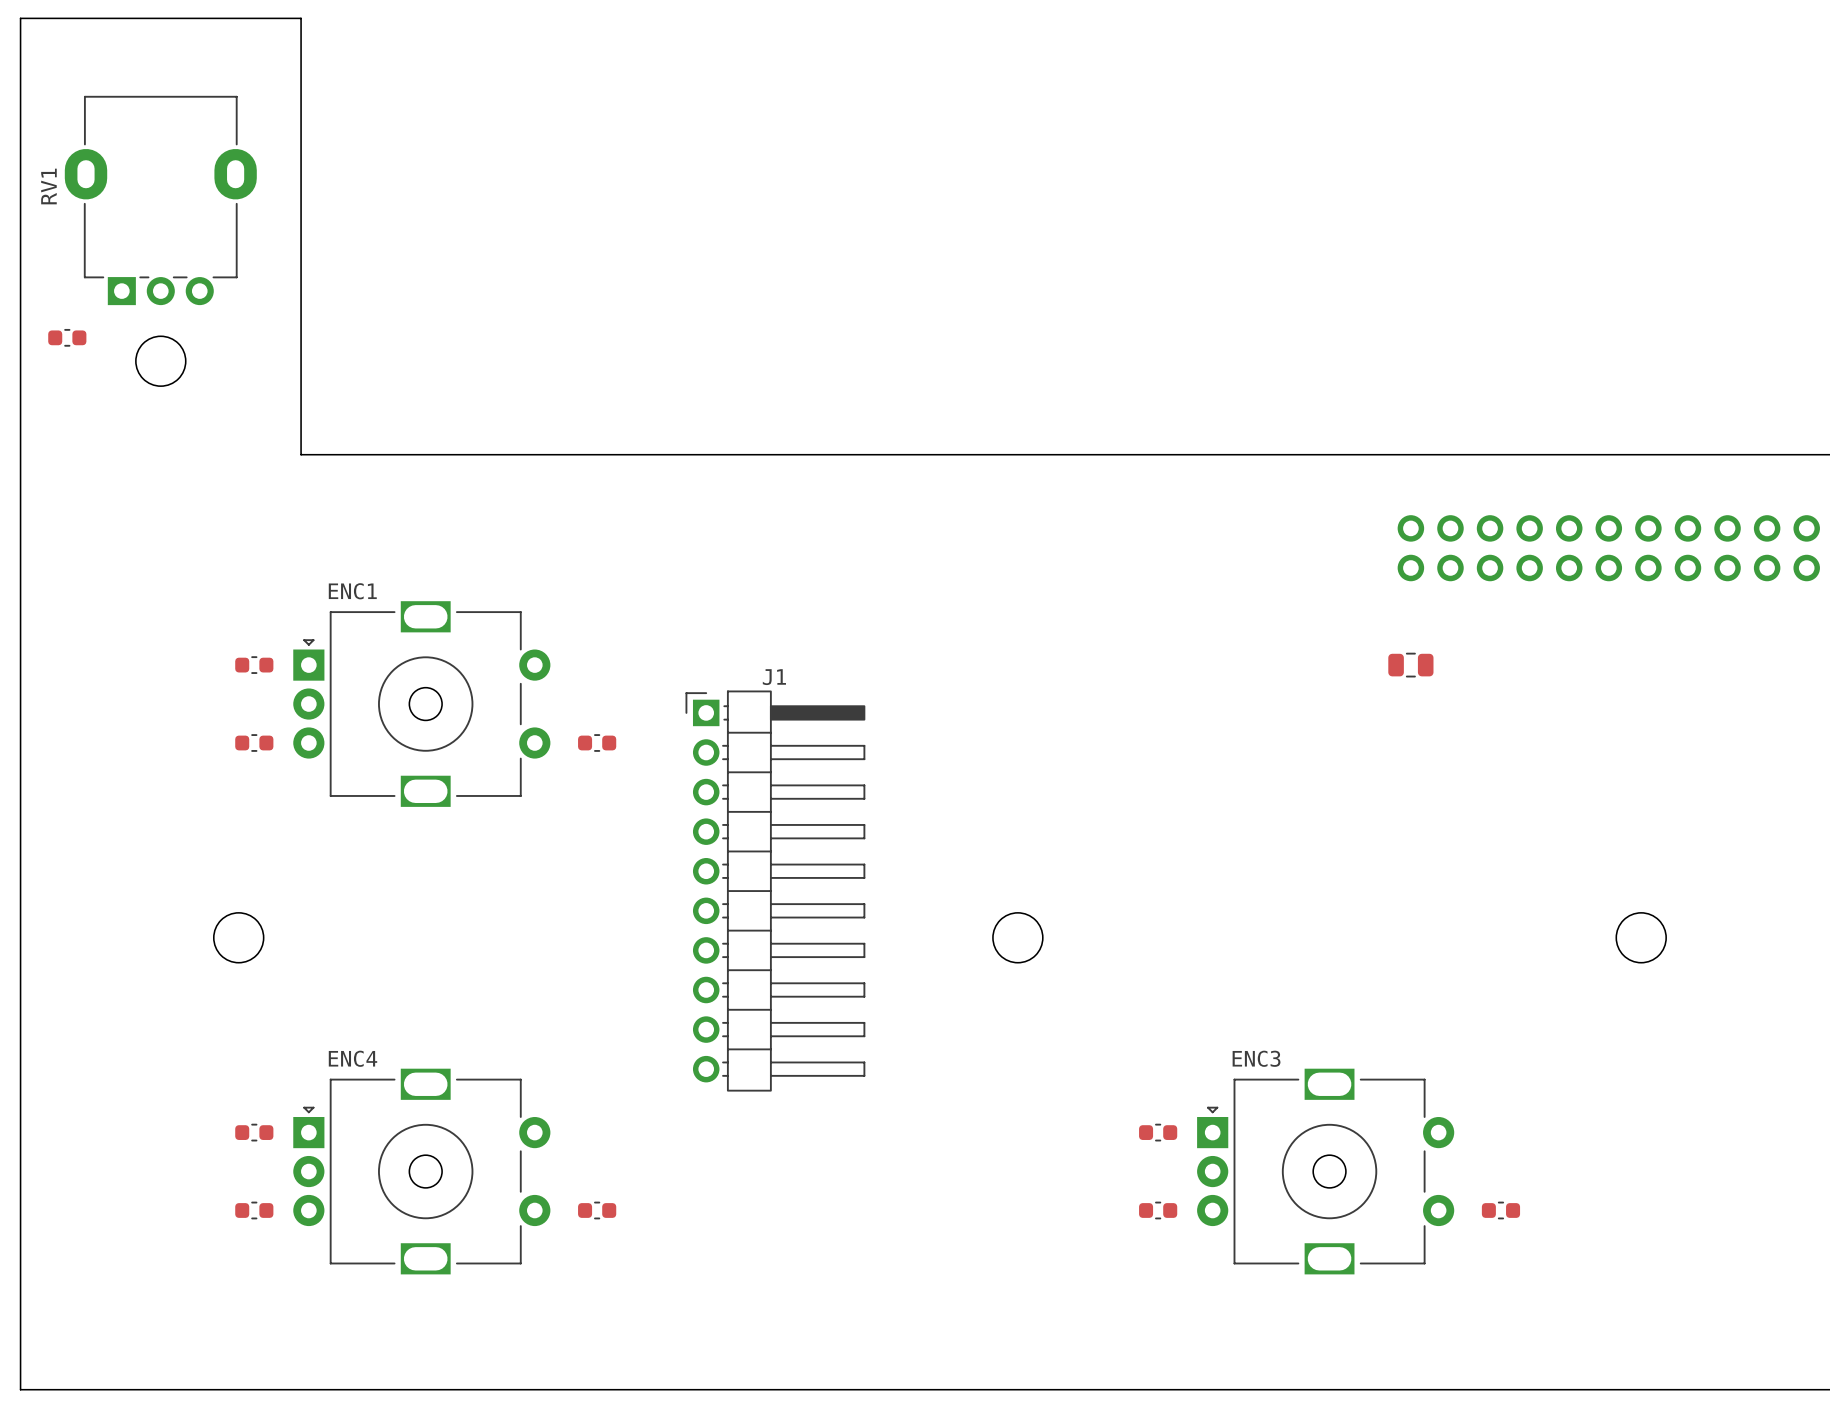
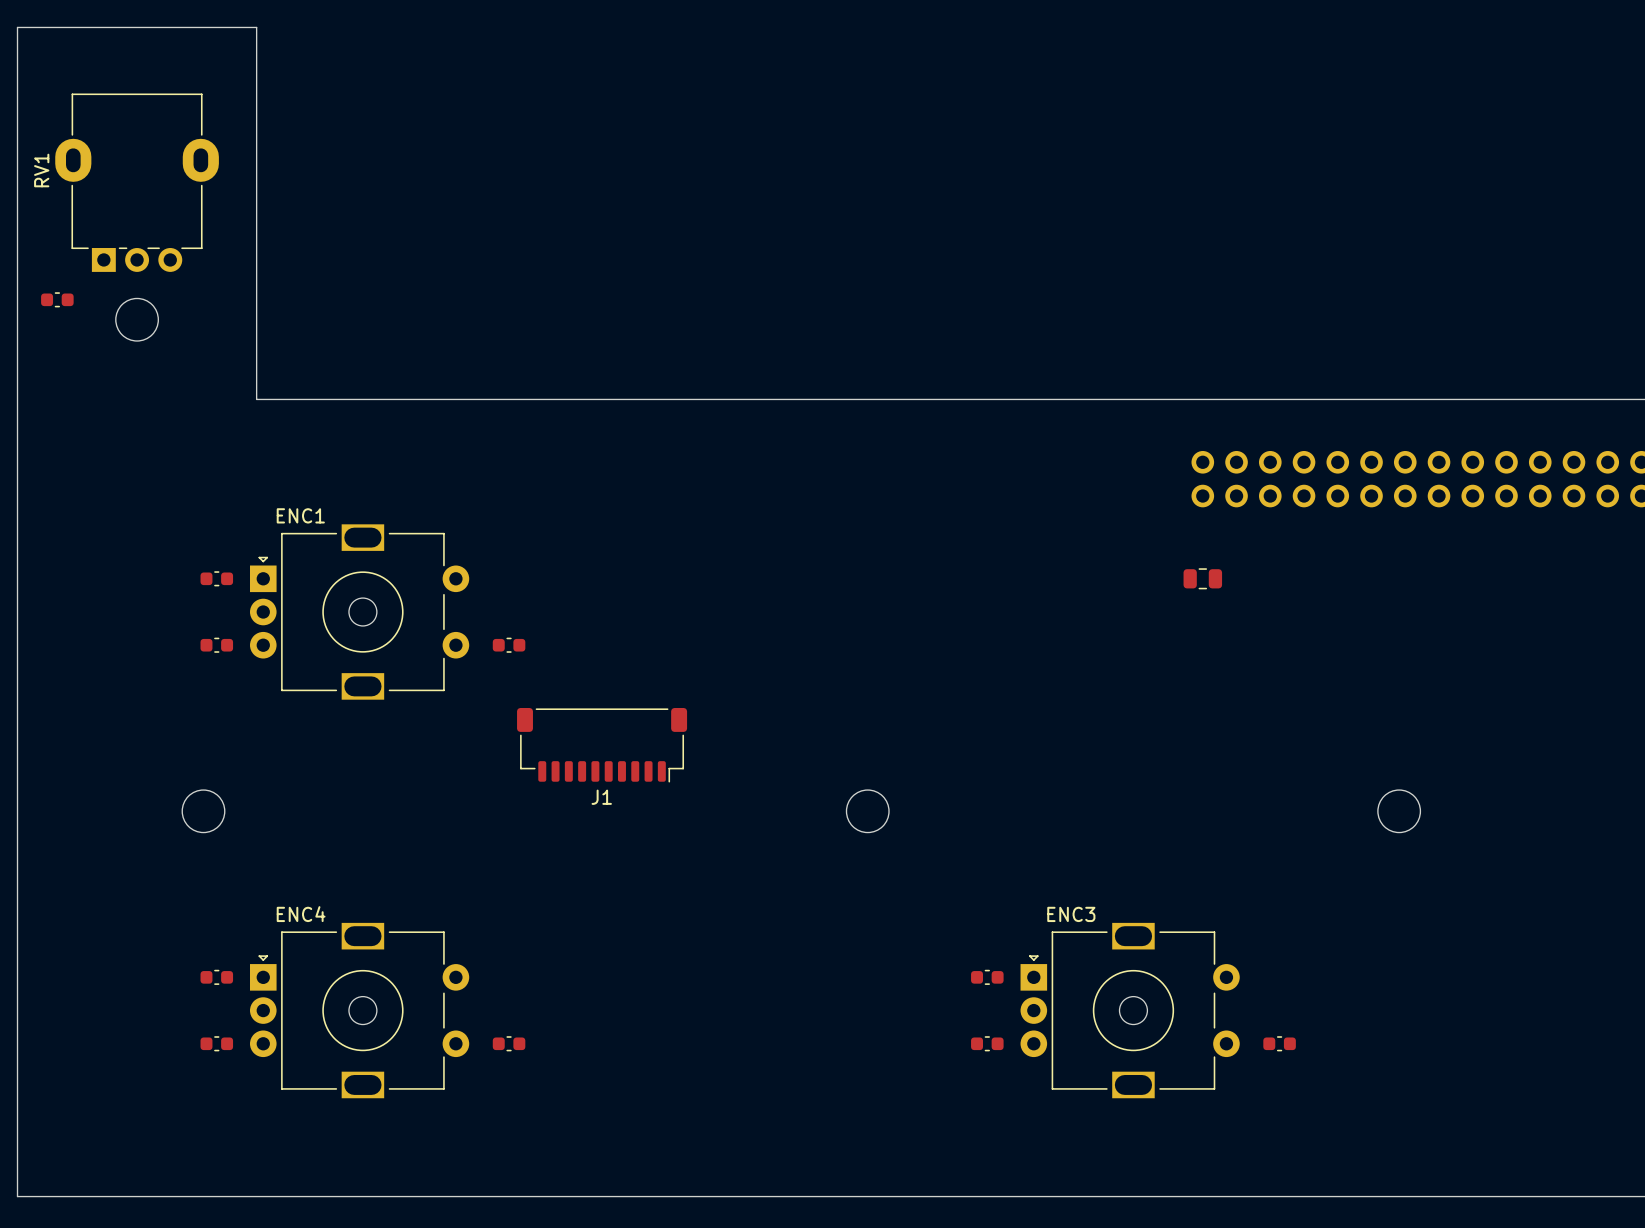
J1 name position: J1 (774, 677) -> J1 (601, 797)
J1 footprint: [685, 690, 866, 1092] -> [517, 708, 688, 783]

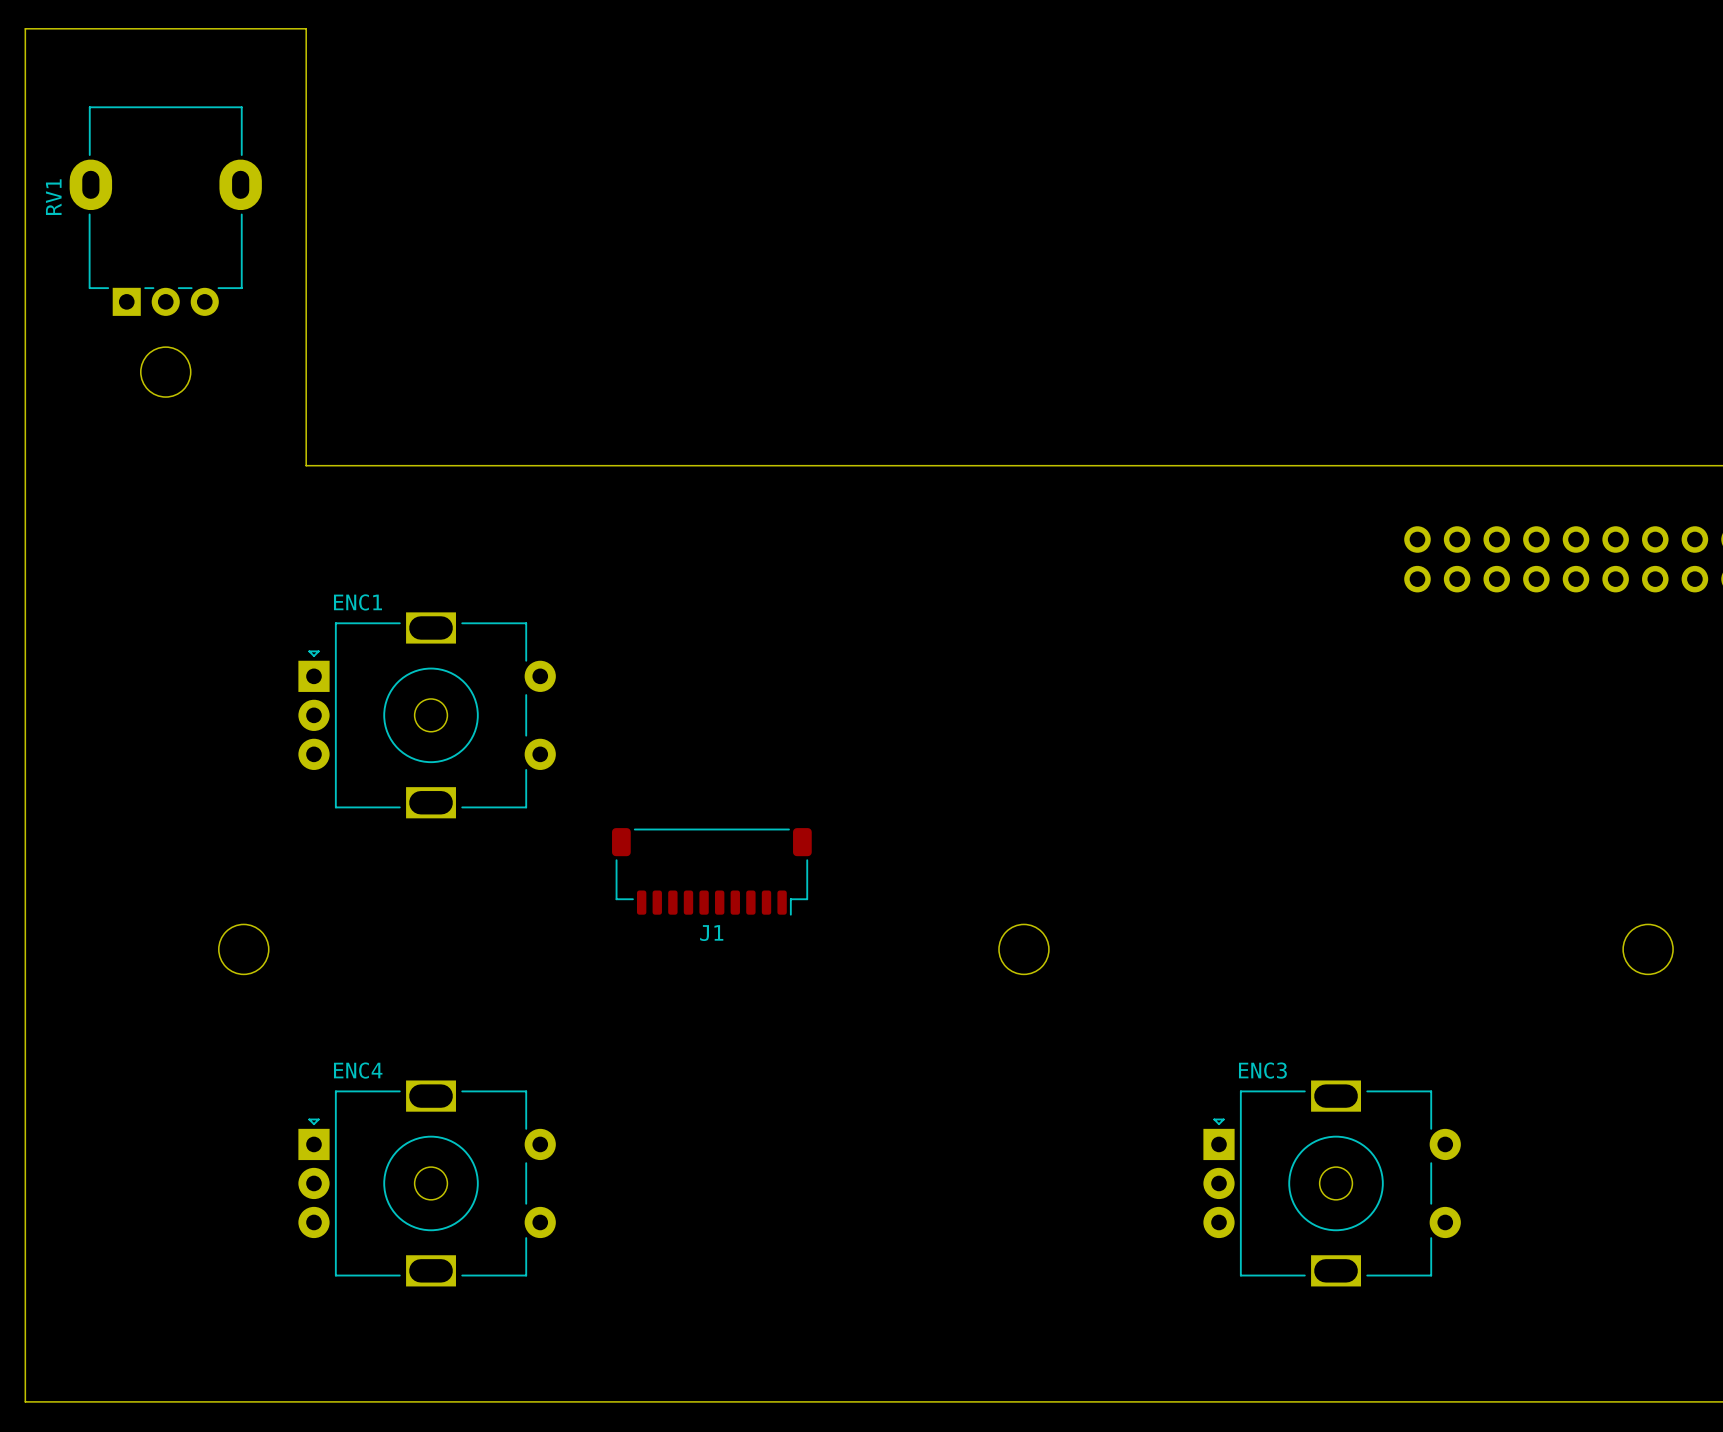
part: (57, 299) -> none
part: (216, 578) -> none
part: (1202, 578) -> none
part: (216, 645) -> none
part: (509, 645) -> none
part: (216, 977) -> none
part: (987, 977) -> none
part: (216, 1043) -> none
part: (509, 1043) -> none
part: (987, 1043) -> none
part: (1279, 1043) -> none

